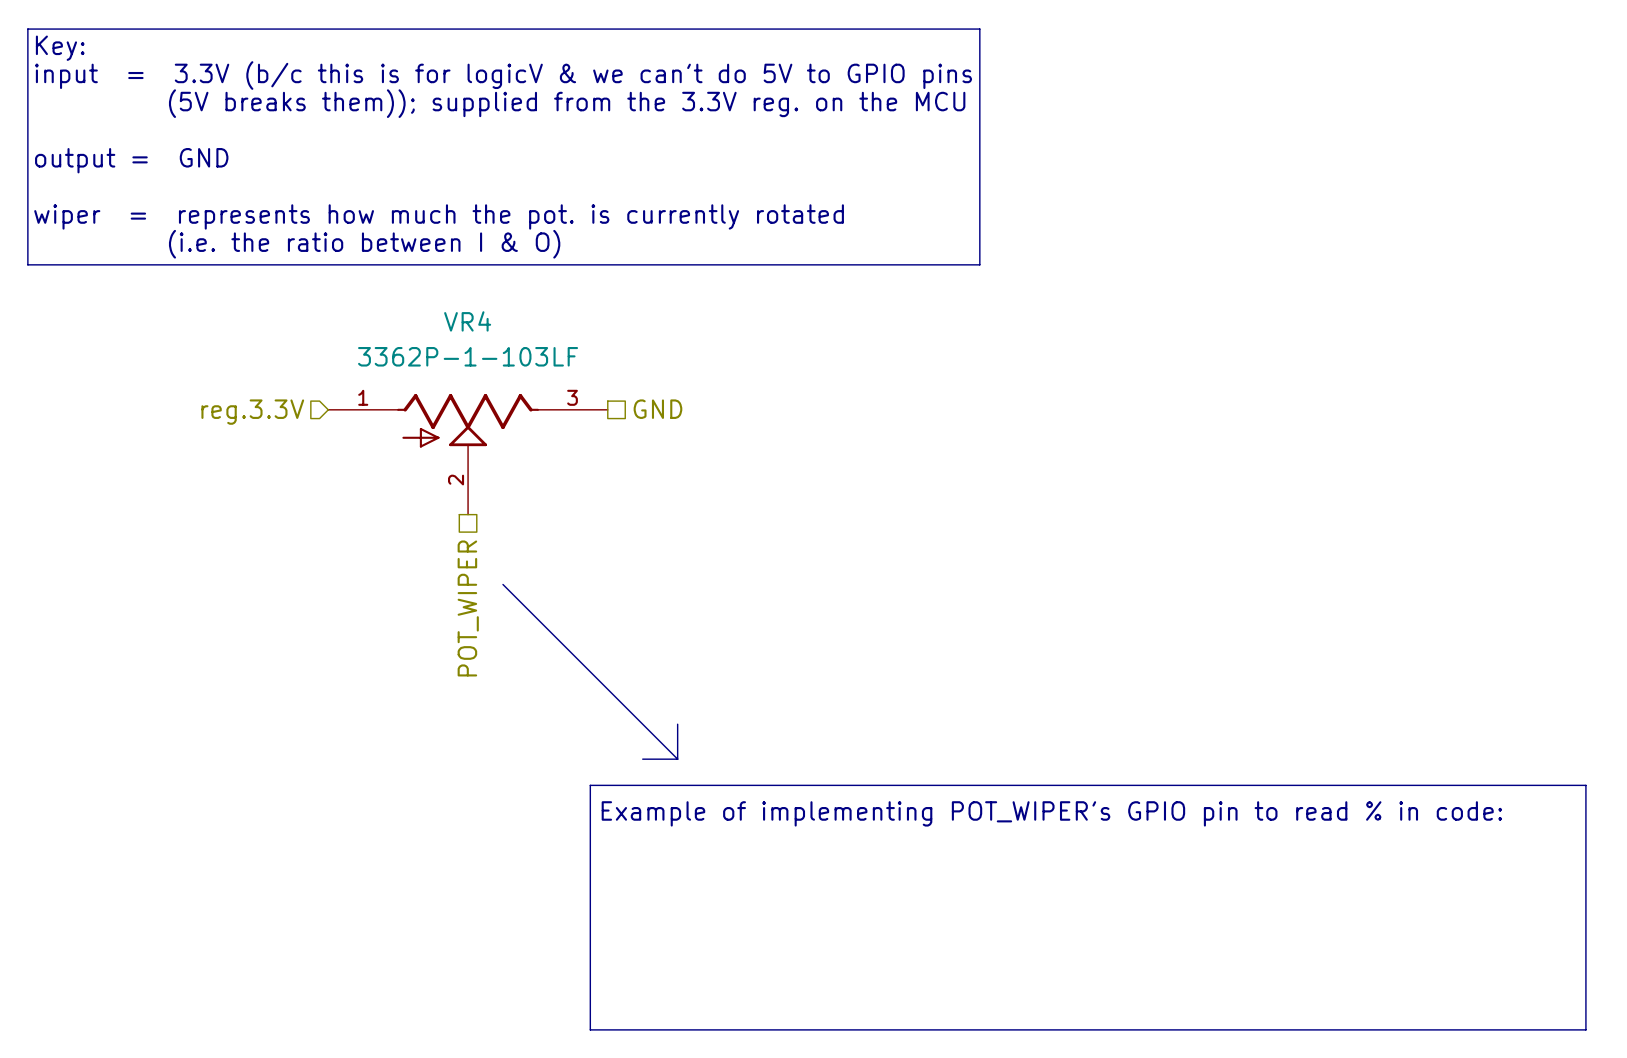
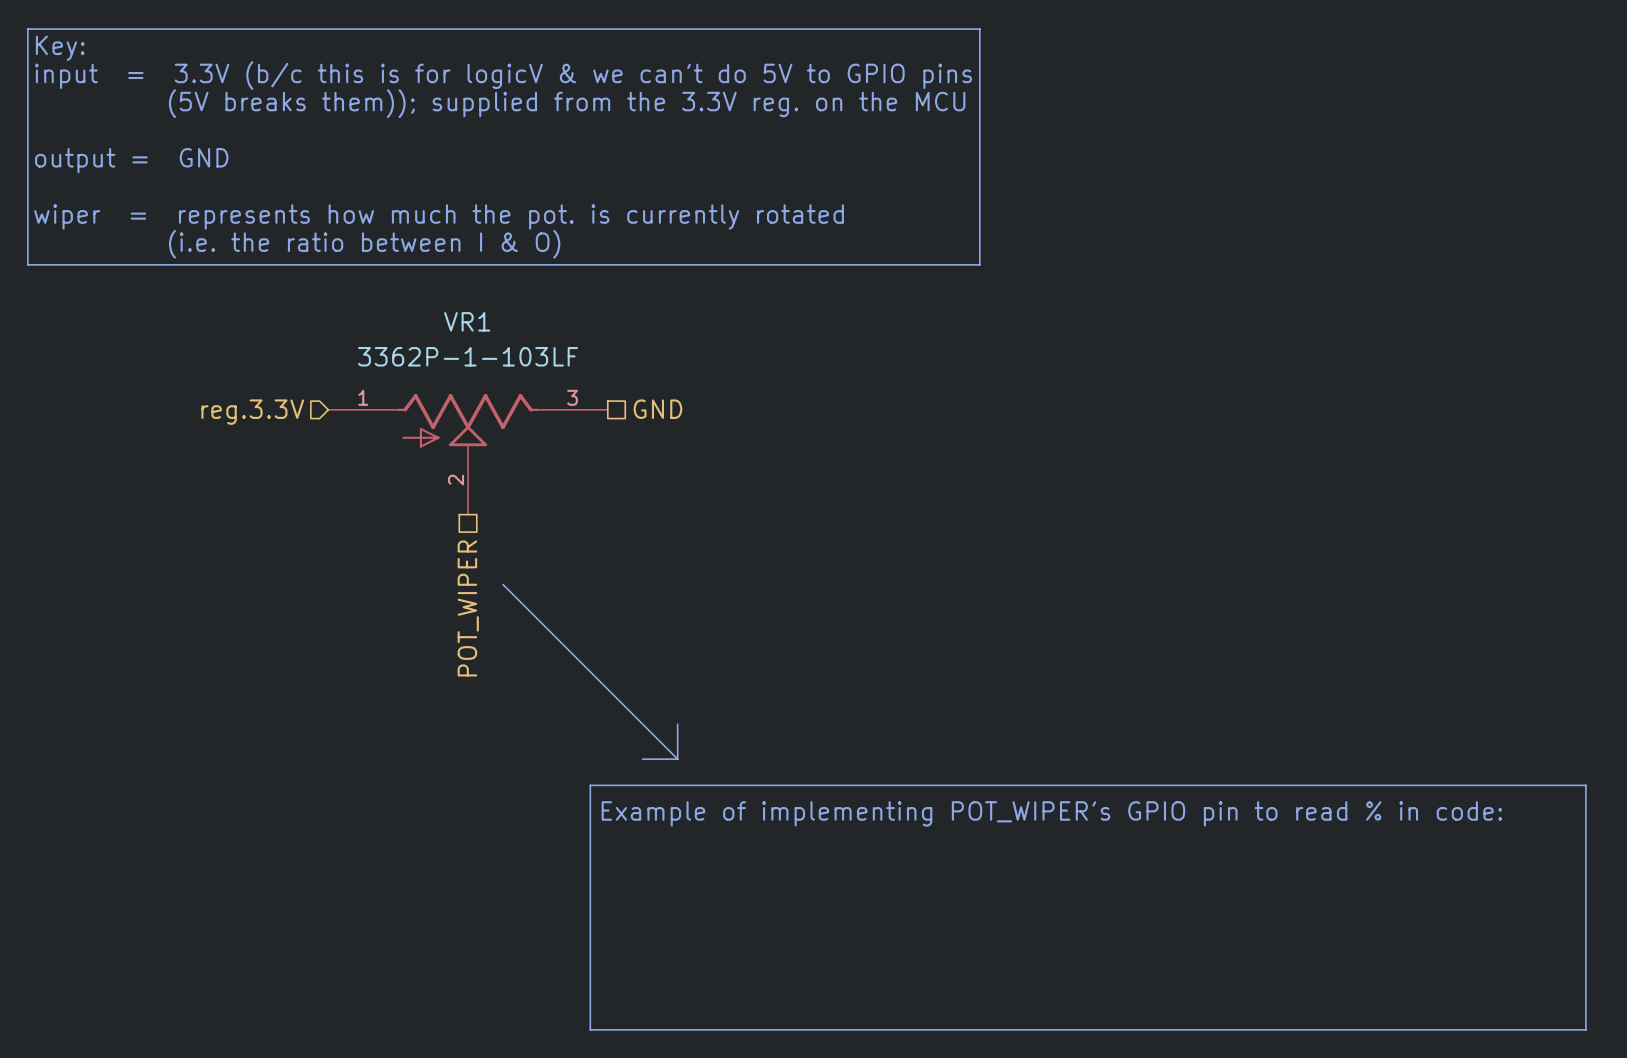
VR4 name: VR4 (467, 321) -> VR1 (467, 321)

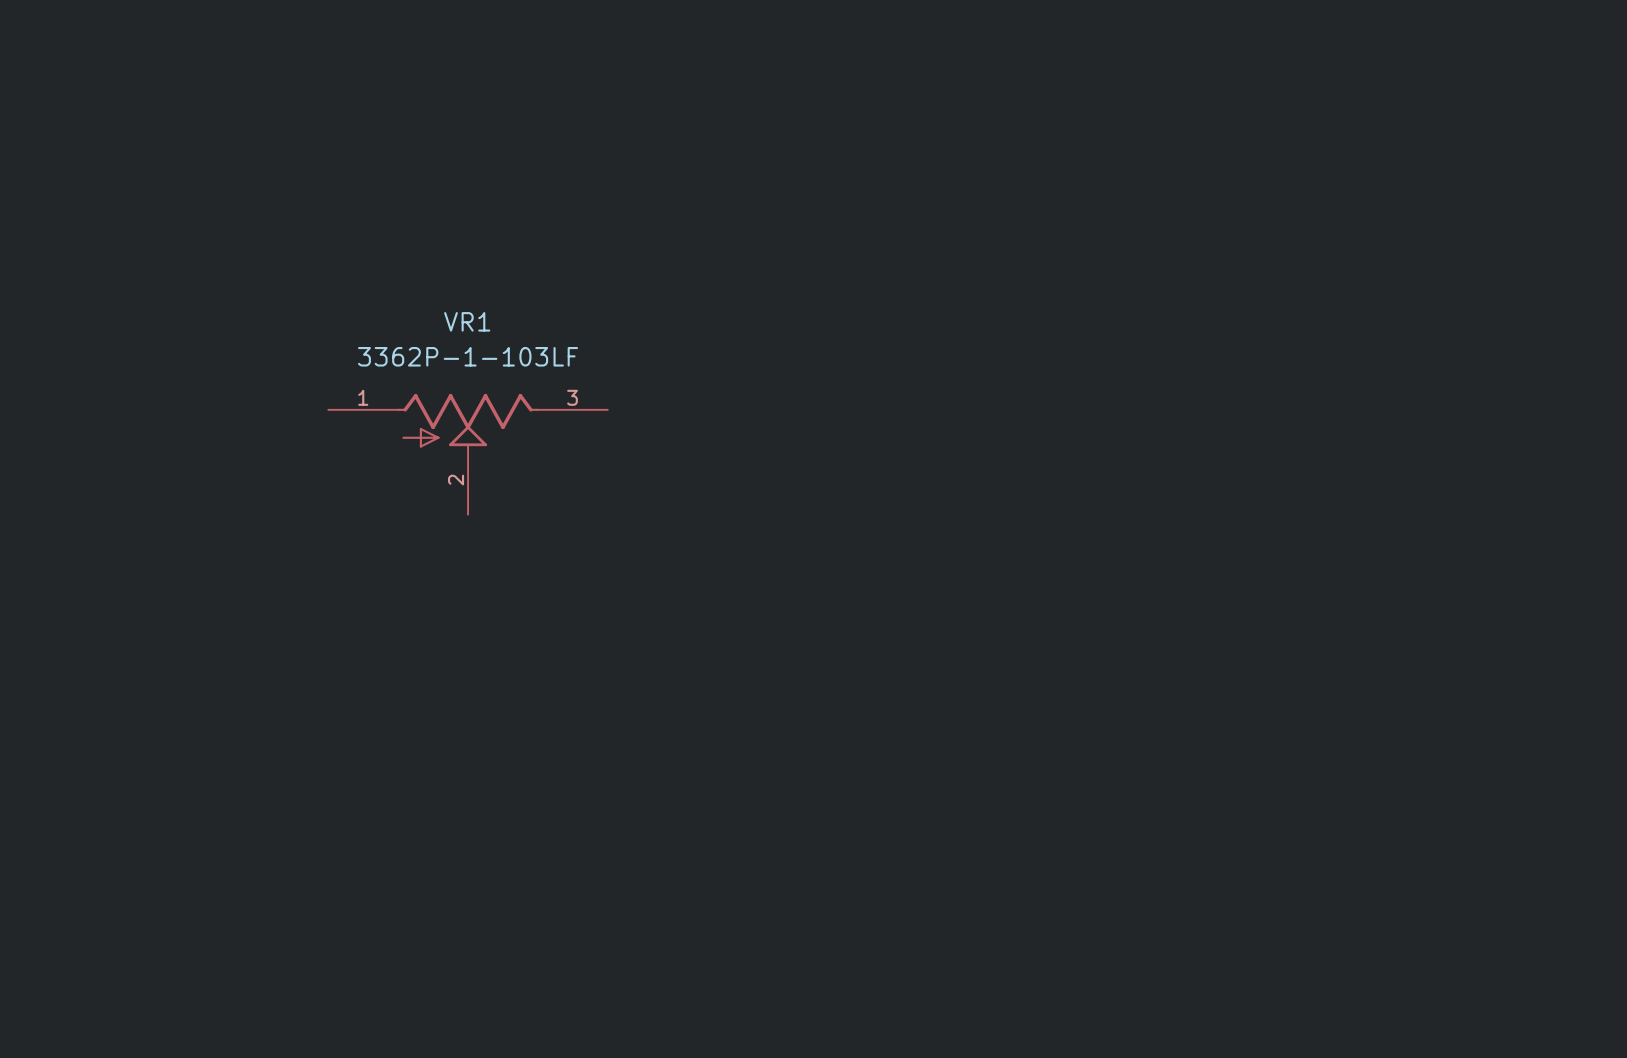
line: (27, 29) (979, 29) (979, 264) (27, 264) (27, 29) -> none
text: Key: (60, 48) -> none
text: input = 3.3V (b/c this is for logicV & we can't do 5V to GPIO pins (503, 75) -> none
text: (5V breaks them)); supplied from the 3.3V reg. on the MCU (567, 103) -> none
text: output = GND (131, 160) -> none
text: wiper = represents how much the pot. is currently rotated (439, 216) -> none
text: (i.e. the ratio between I & O) (364, 244) -> none
hierarchical label: GND (657, 409) -> none
hierarchical label: reg.3.3V (252, 412) -> none
line: (502, 584) (677, 759) -> none
hierarchical label: POT_WIPER (468, 608) -> none
line: (677, 724) (677, 759) -> none
line: (642, 759) (677, 759) -> none
line: (590, 785) (1585, 785) (1585, 1029) (590, 1029) (590, 785) -> none
text: Example of implementing POT_WIPER's GPIO pin to read % in code: (1051, 813) -> none

